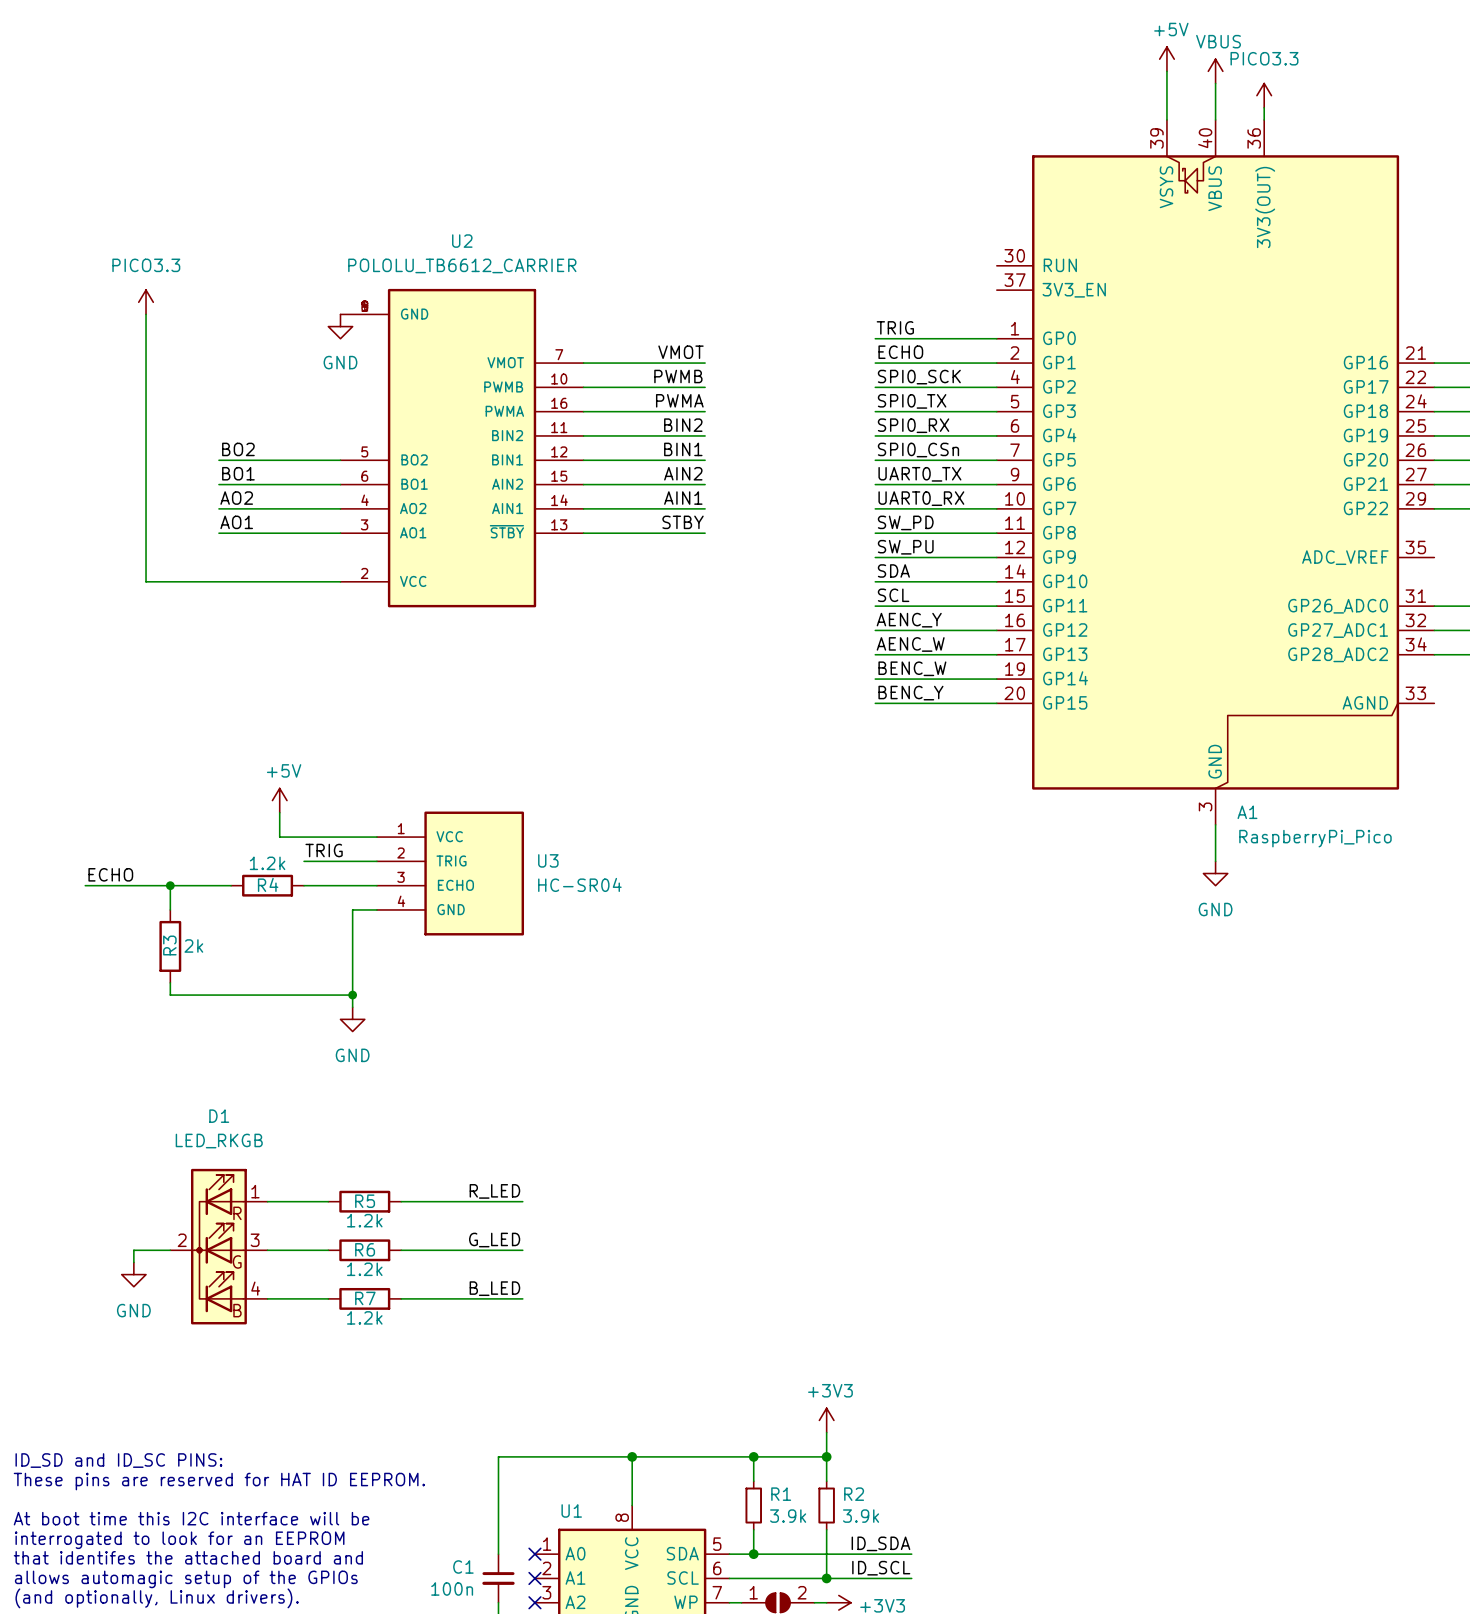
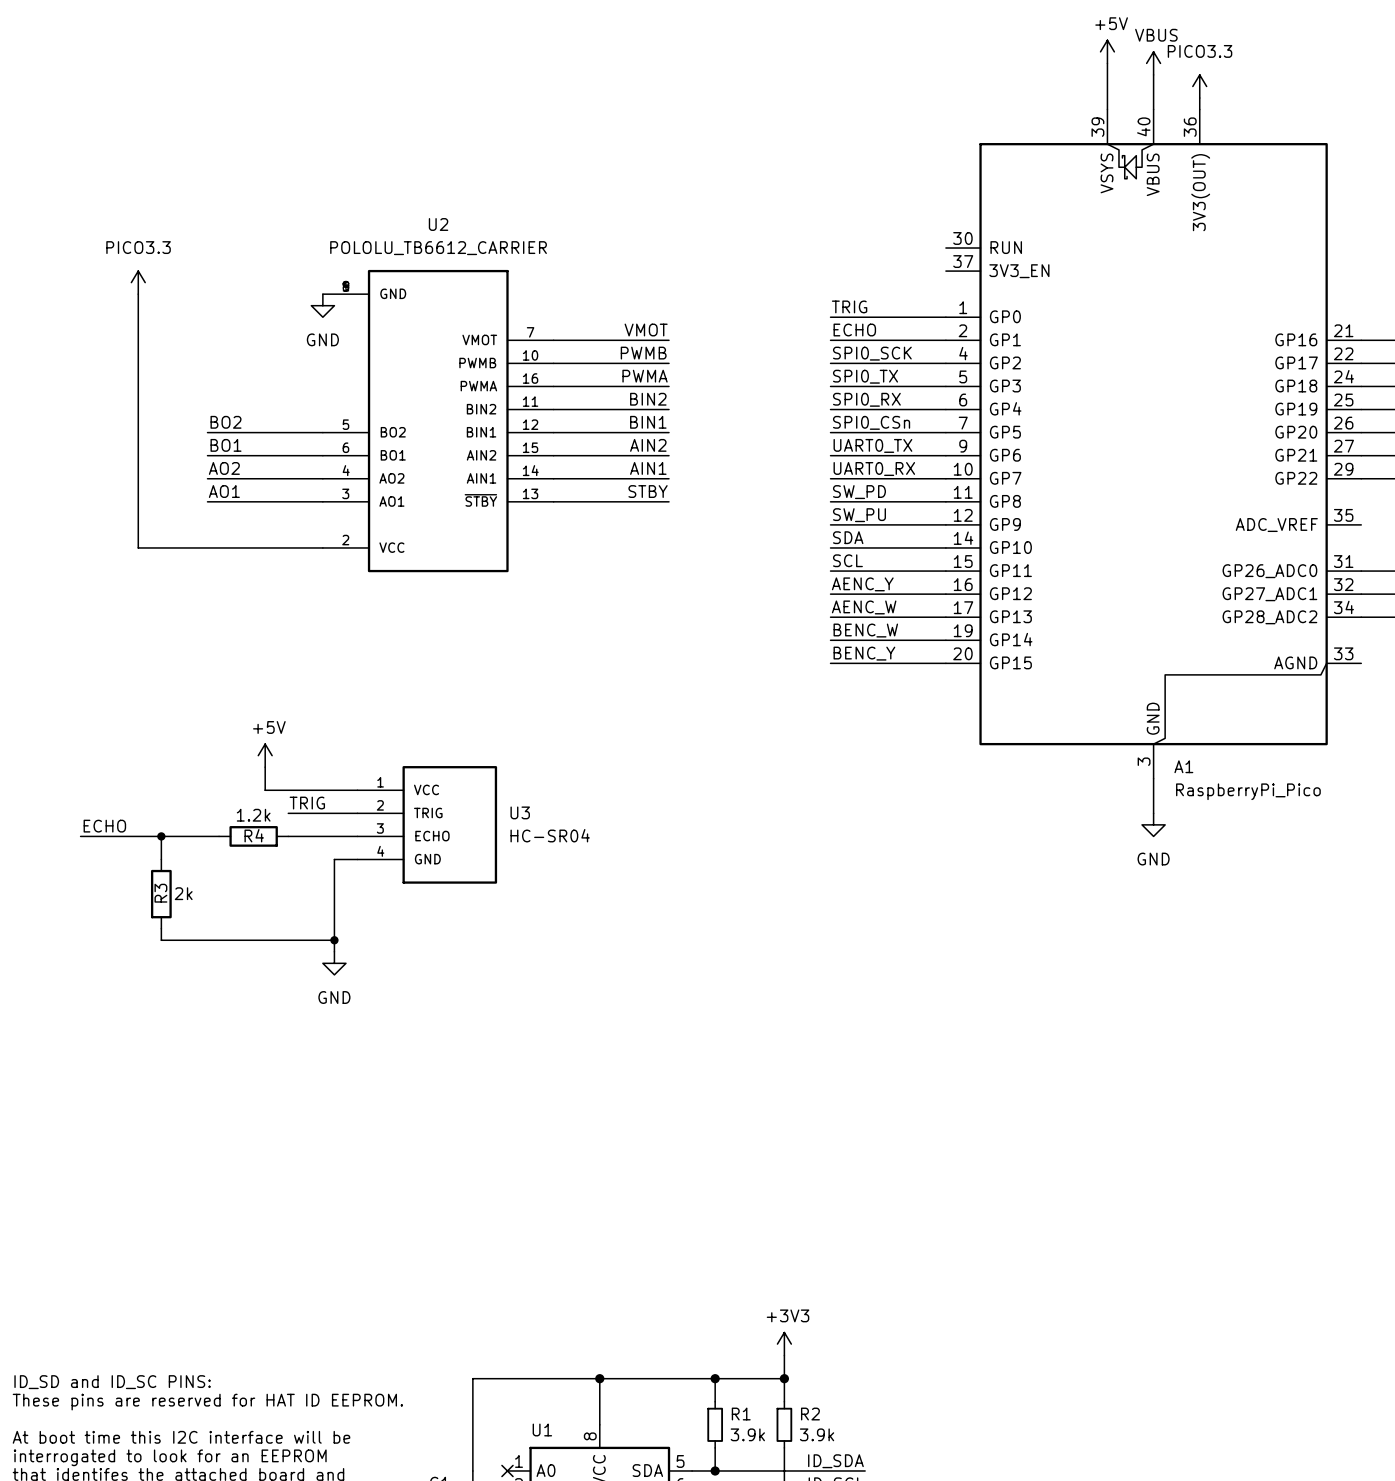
label: R_LED (494, 1191) -> none
wire: (267, 1201) (328, 1201) -> none
R5: 1.2k (364, 1201) -> none
wire: (401, 1201) (522, 1201) -> none
label: G_LED (494, 1240) -> none
D1: LED_RKGB (218, 1246) -> none
wire: (170, 1250) (133, 1250) (133, 1262) -> none
wire: (267, 1250) (328, 1250) -> none
R6: 1.2k (364, 1250) -> none
wire: (401, 1250) (522, 1250) -> none
power symbol: GND (133, 1274) -> none
label: B_LED (494, 1288) -> none
wire: (267, 1298) (328, 1298) -> none
R7: 1.2k (364, 1298) -> none
wire: (401, 1298) (522, 1298) -> none

